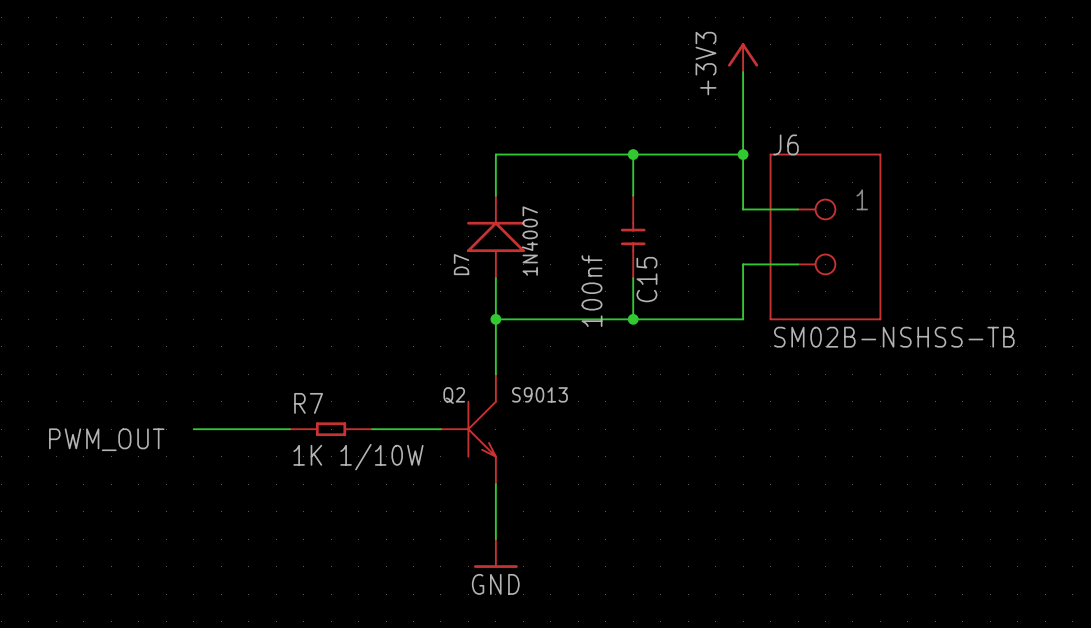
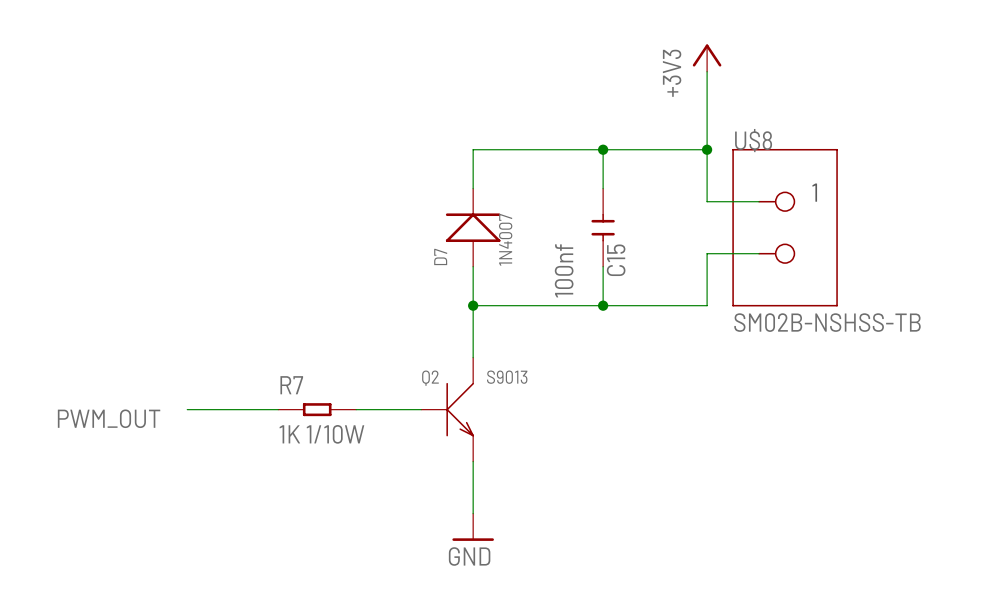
J6 name: J6 (785, 144) -> U$8 (753, 140)

